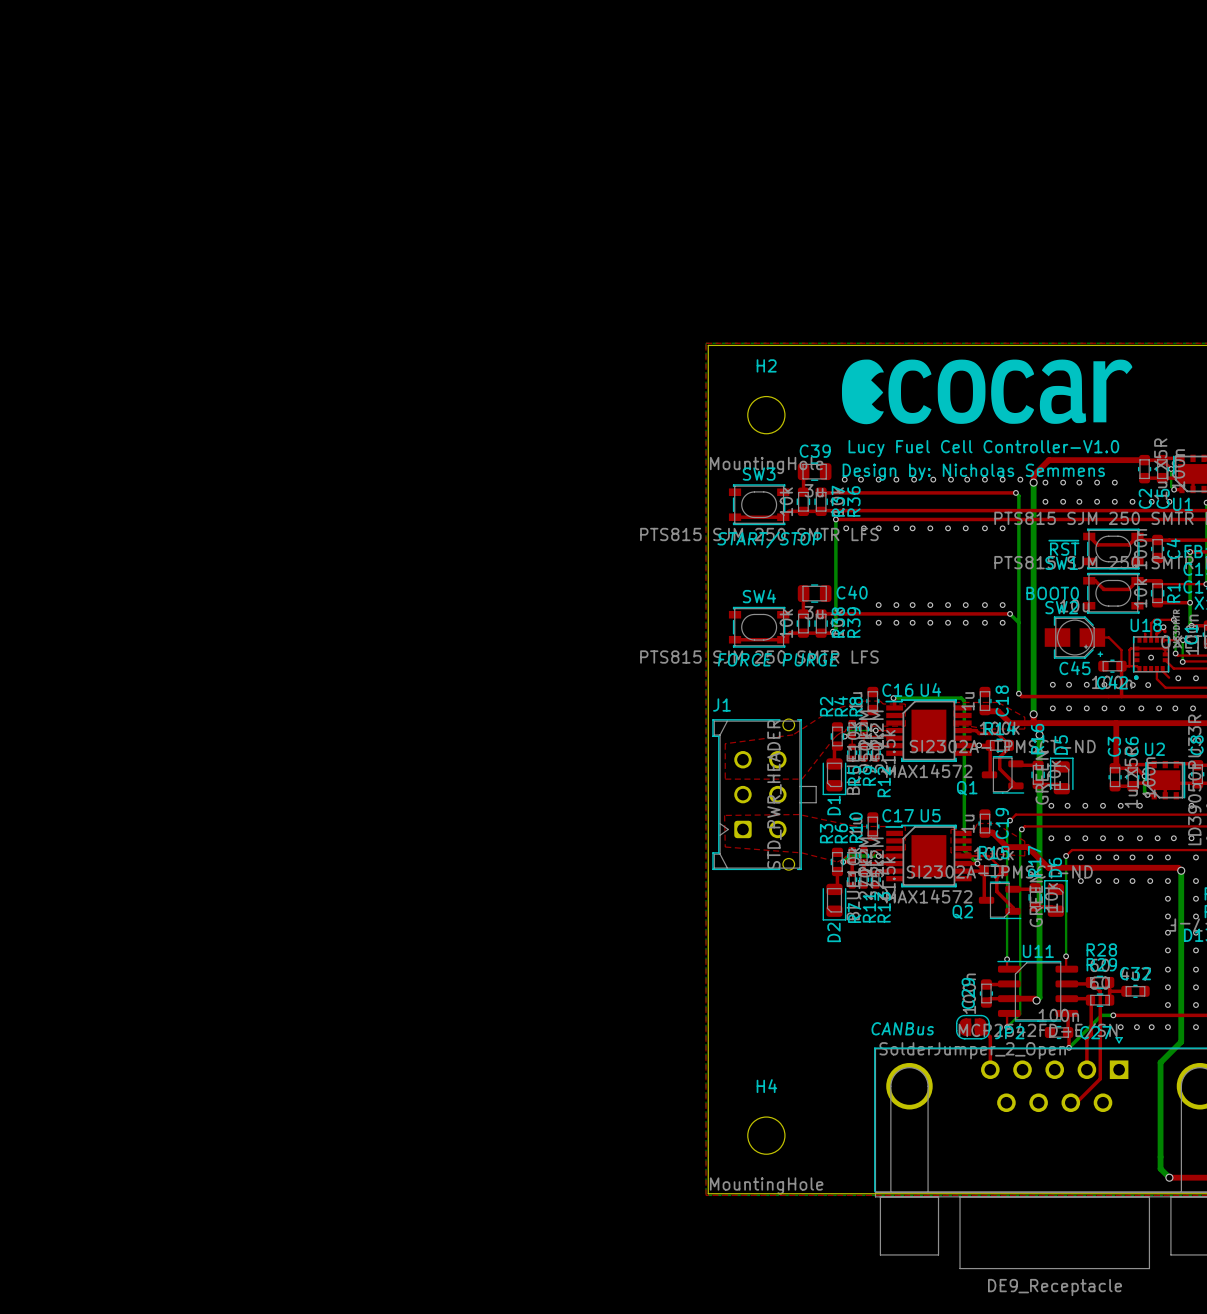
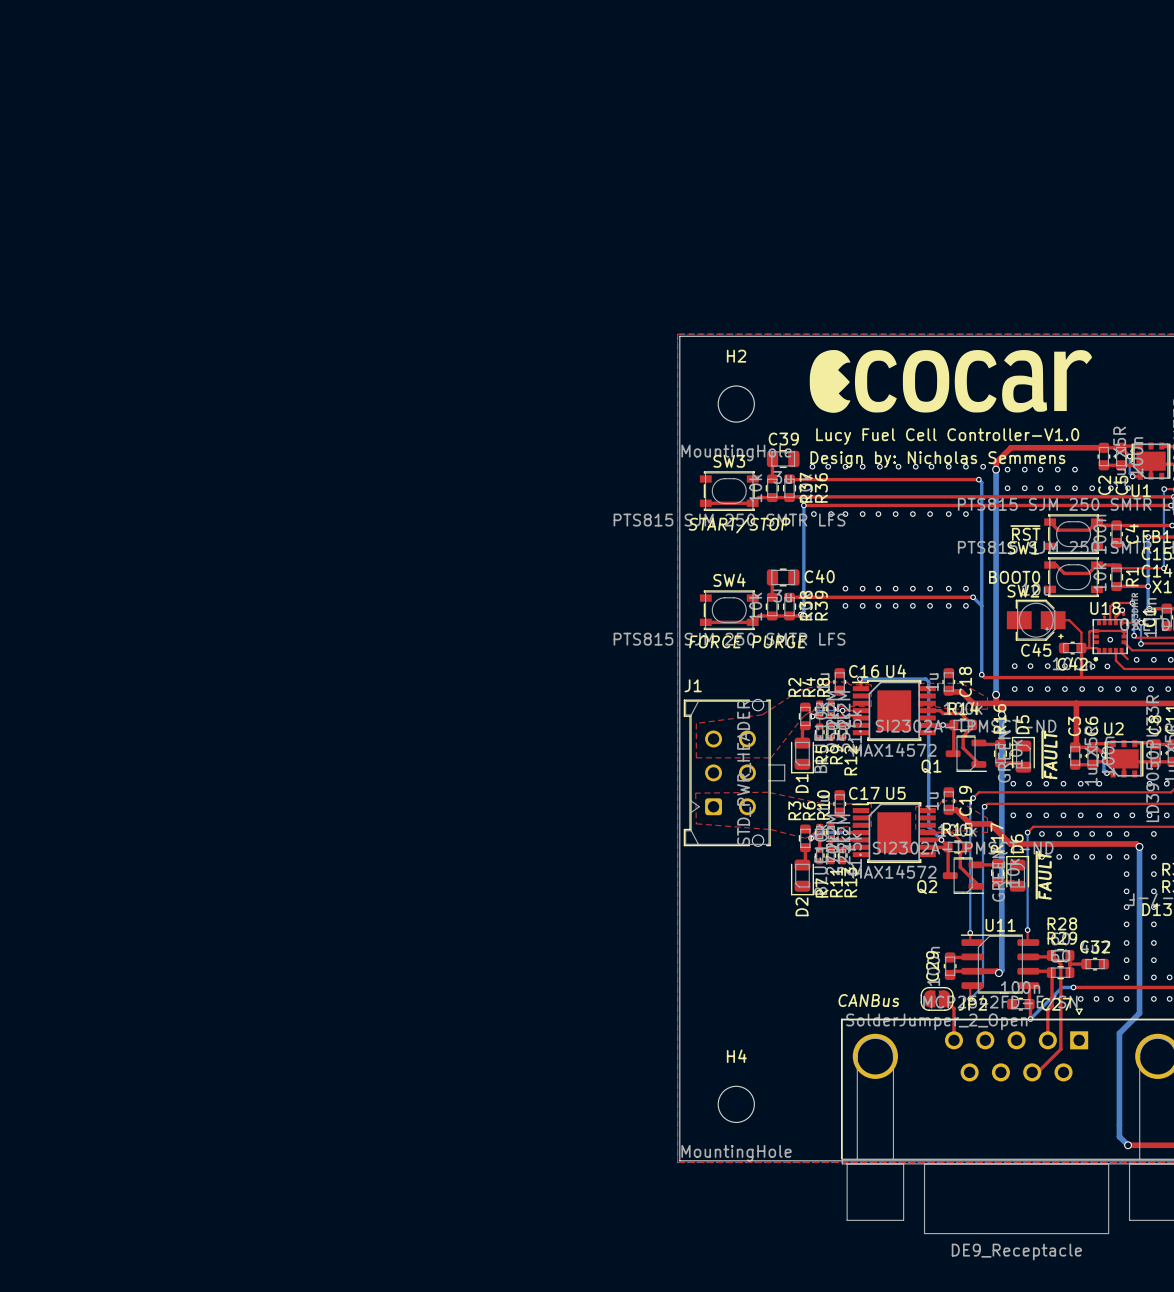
text: none -> ~{FAULT} (1049, 754)
text: none -> ~{FAULT} (1043, 875)

